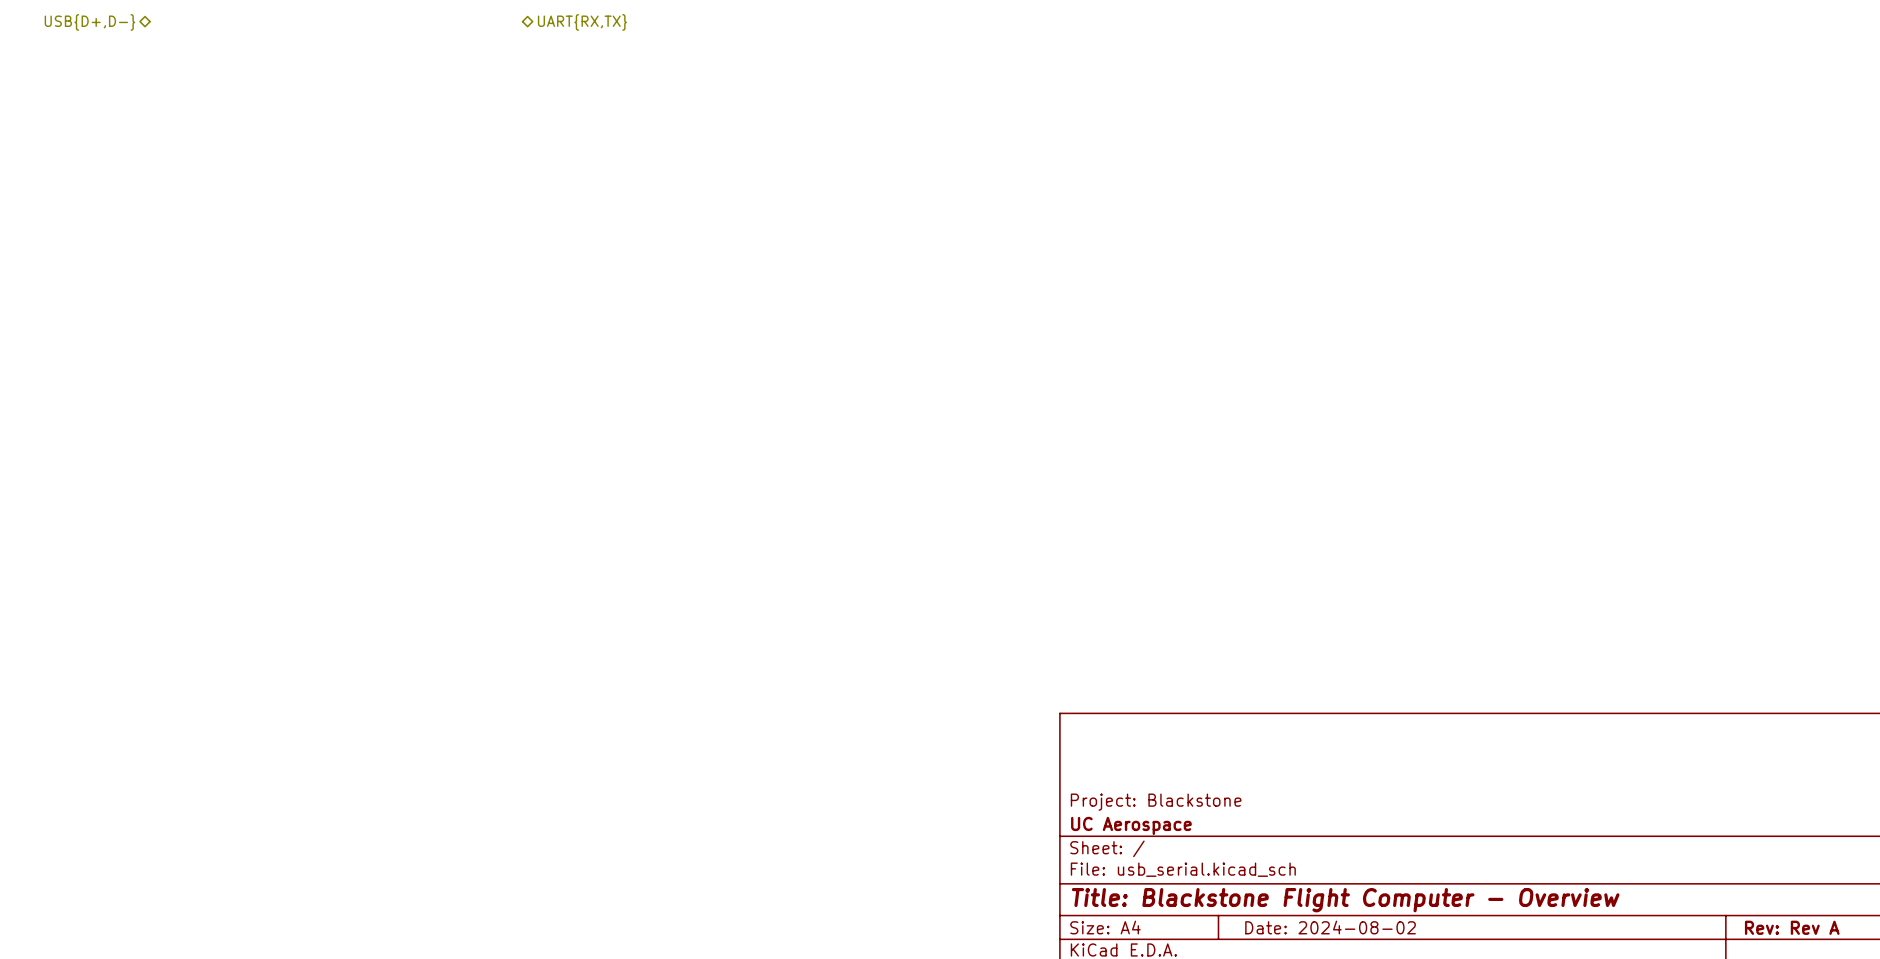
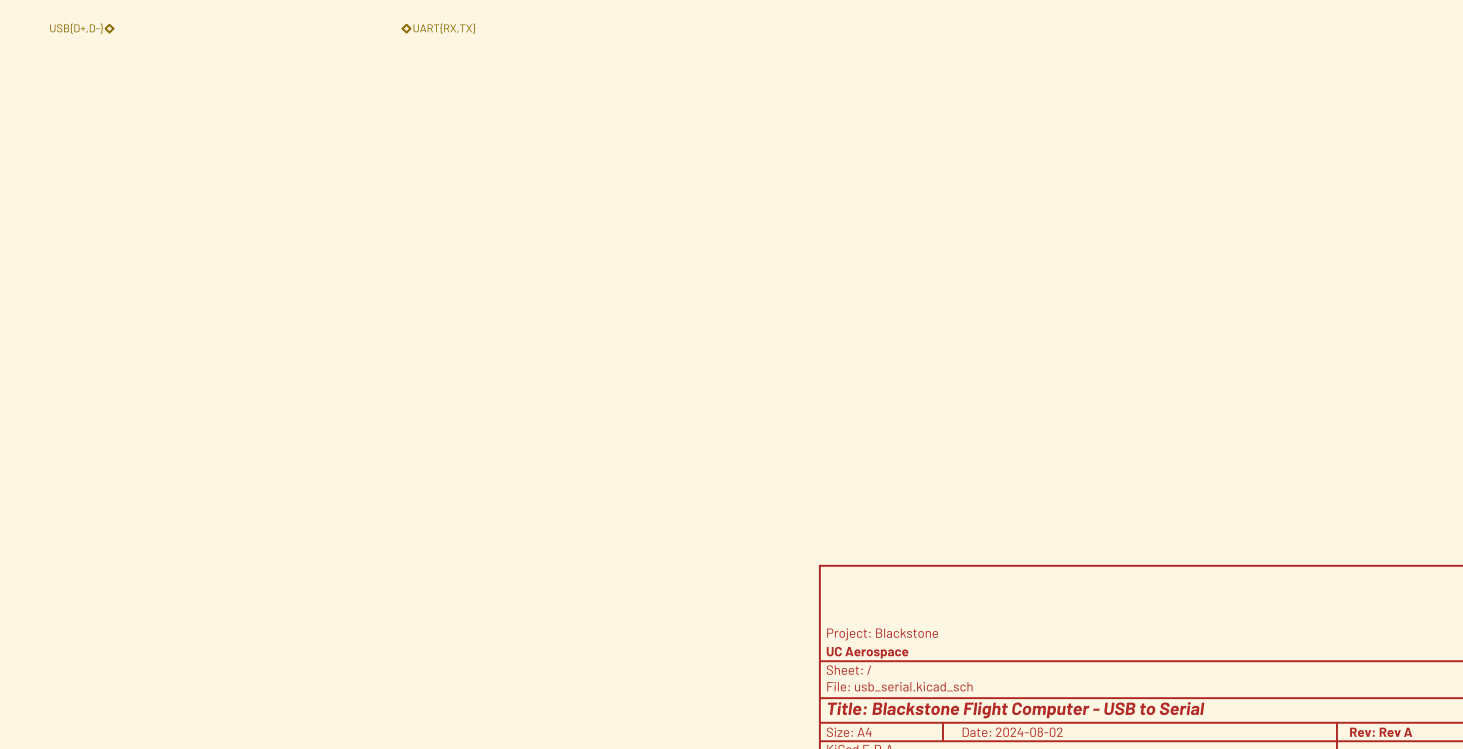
title block: Title: Blackstone Flight Computer - Overview (1345, 900) -> Title: Blackstone Flight Computer - USB to Serial (1016, 710)

